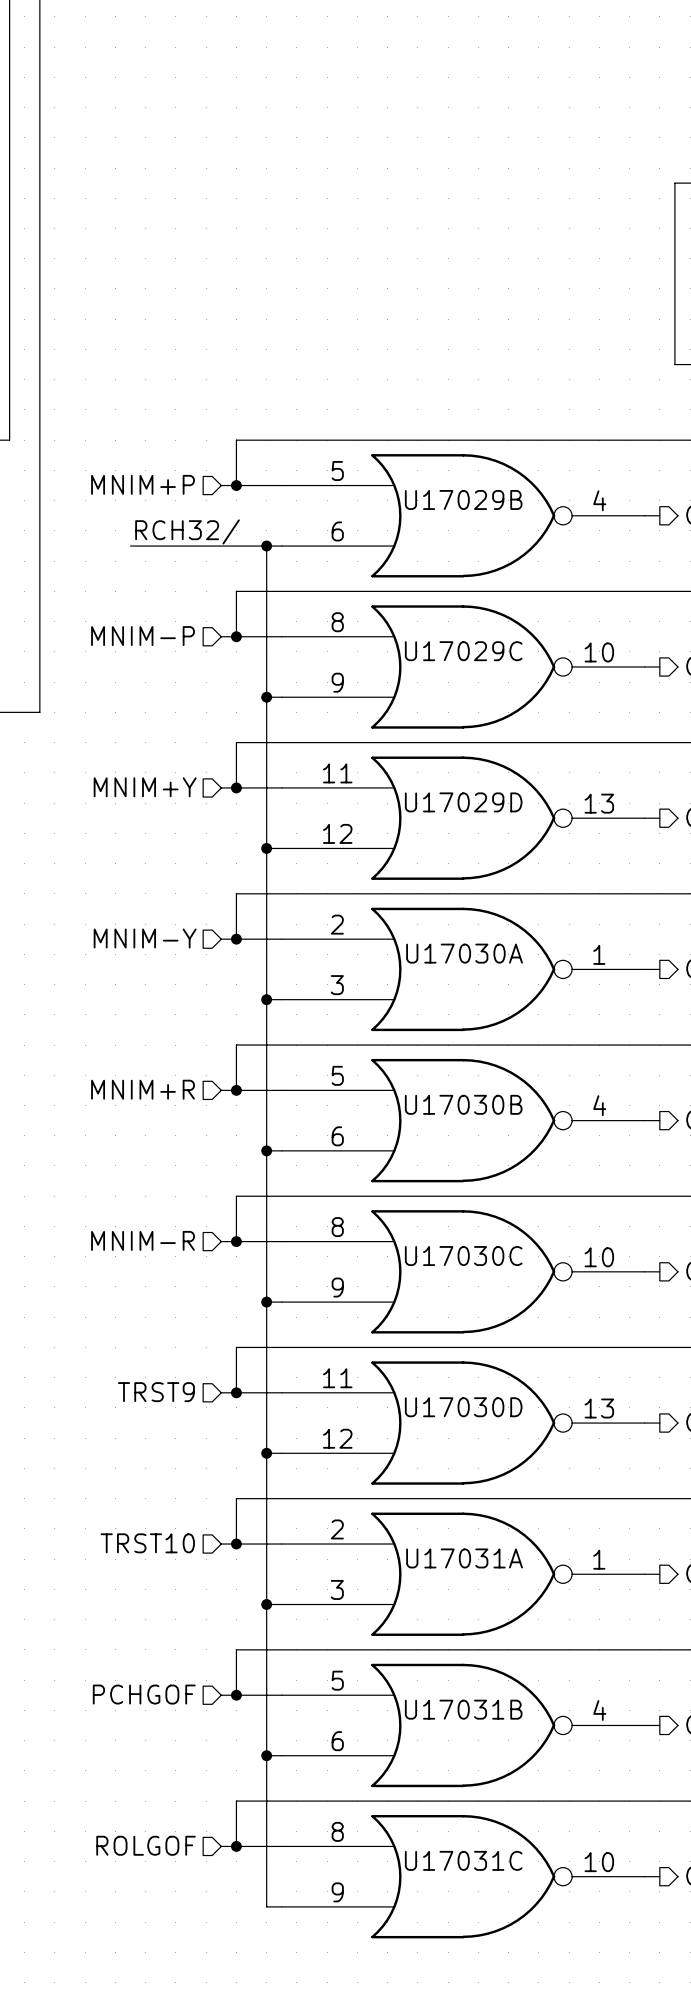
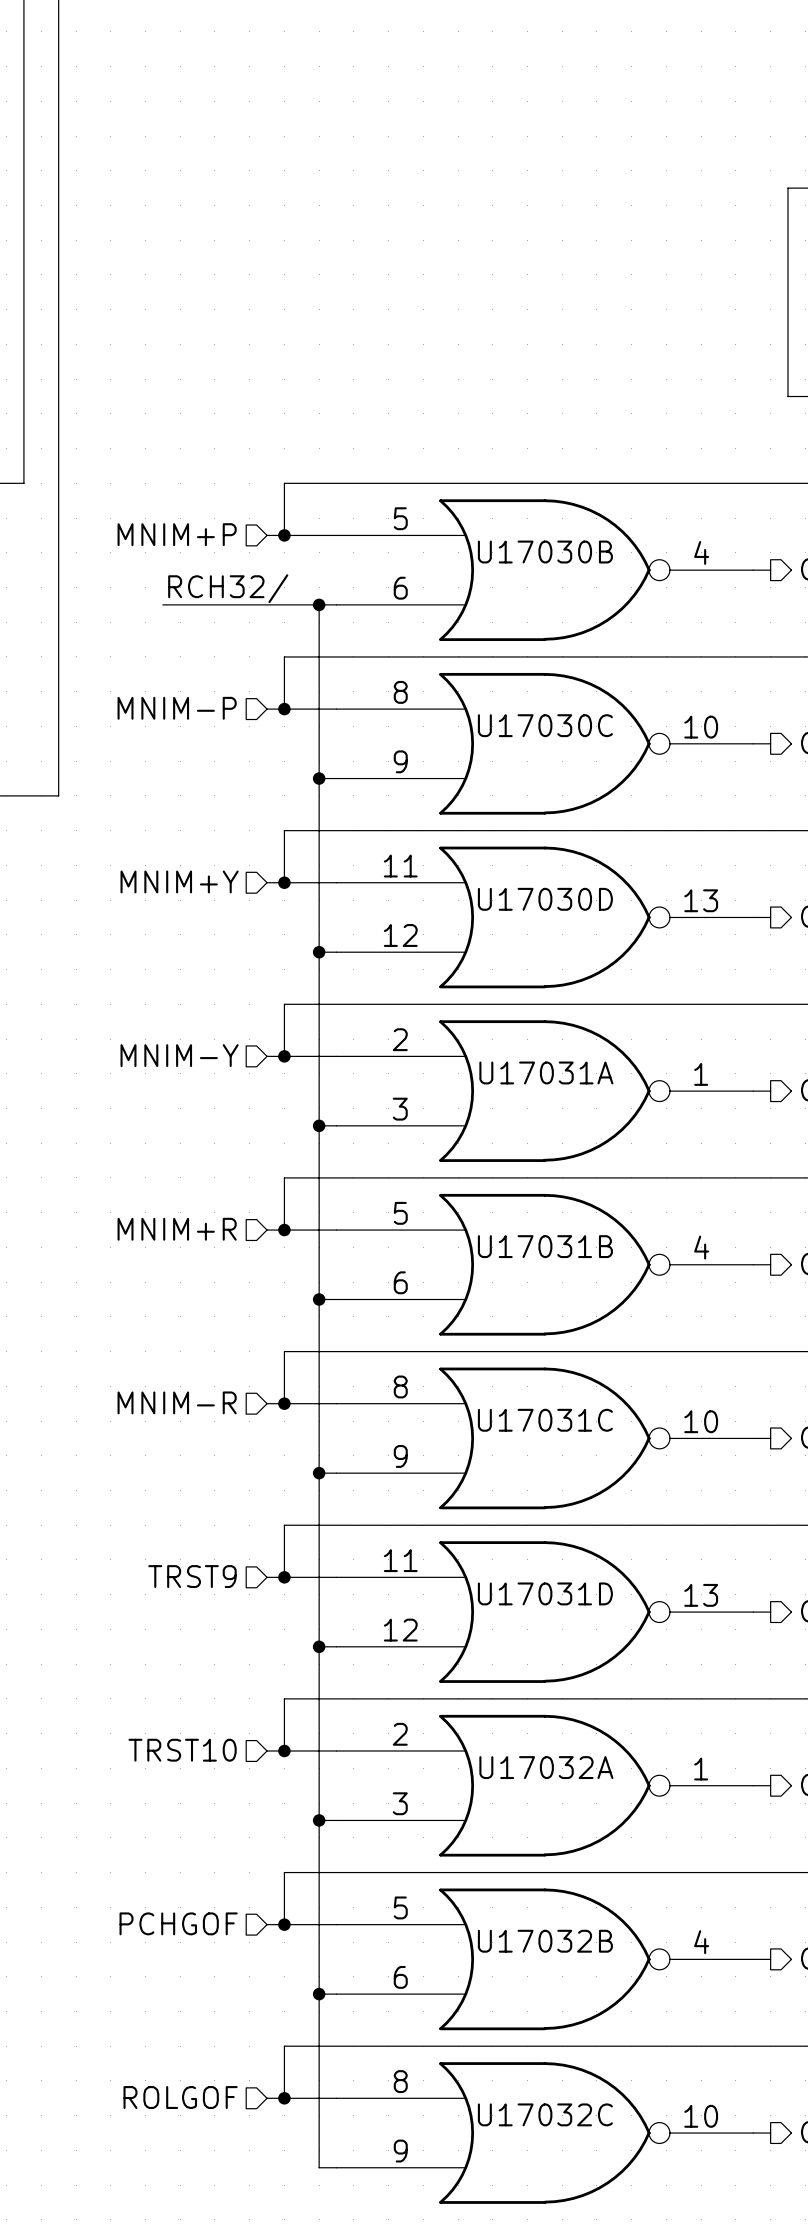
U17029B name: U17029B (463, 499) -> U17030B (545, 552)
U17029C name: U17029C (463, 651) -> U17030C (545, 725)
U17029D name: U17029D (463, 802) -> U17030D (545, 899)
U17030A name: U17030A (464, 953) -> U17031A (546, 1072)
U17030B name: U17030B (463, 1104) -> U17031B (545, 1246)
U17030C name: U17030C (463, 1256) -> U17031C (545, 1420)
U17030D name: U17030D (463, 1407) -> U17031D (545, 1593)
U17031A name: U17031A (464, 1558) -> U17032A (546, 1767)
U17031B name: U17031B (463, 1709) -> U17032B (545, 1941)
U17031C name: U17031C (463, 1860) -> U17032C (545, 2114)

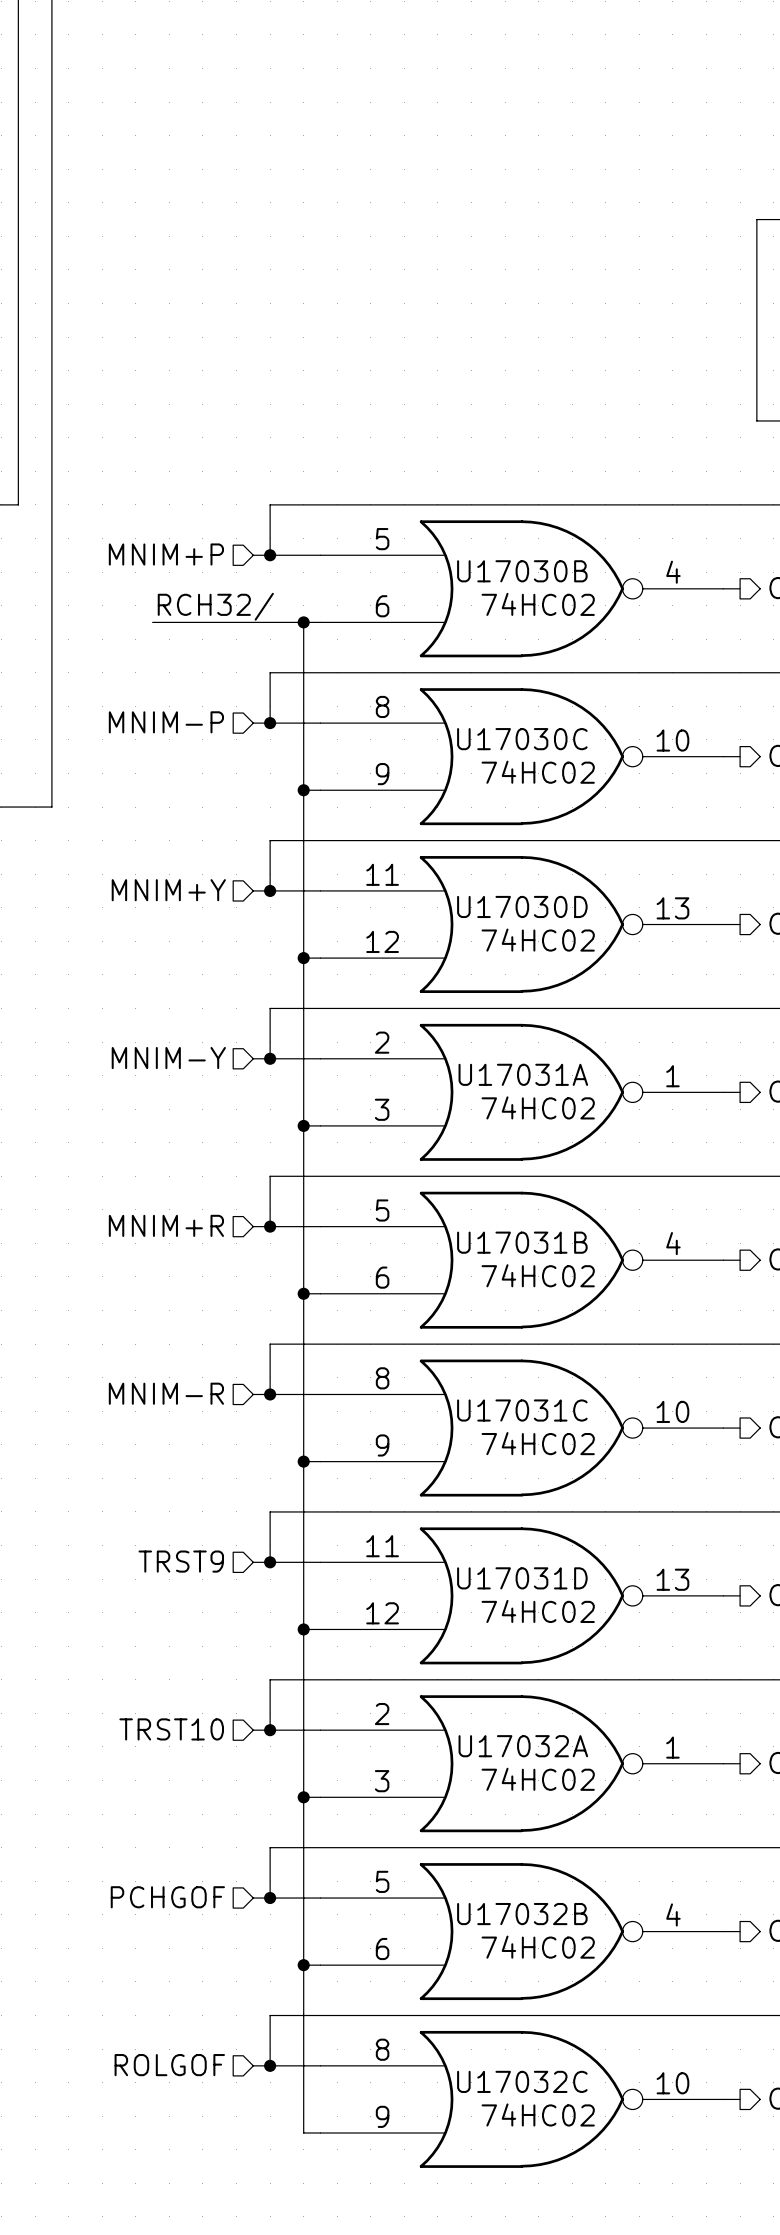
U17030B value: none -> 74HC02 (538, 604)
U17030C value: none -> 74HC02 (538, 772)
U17030D value: none -> 74HC02 (538, 940)
U17031A value: none -> 74HC02 (538, 1107)
U17031B value: none -> 74HC02 (538, 1275)
U17031C value: none -> 74HC02 (538, 1443)
U17031D value: none -> 74HC02 (538, 1611)
U17032A value: none -> 74HC02 (538, 1779)
U17032B value: none -> 74HC02 (538, 1947)
U17032C value: none -> 74HC02 (538, 2114)

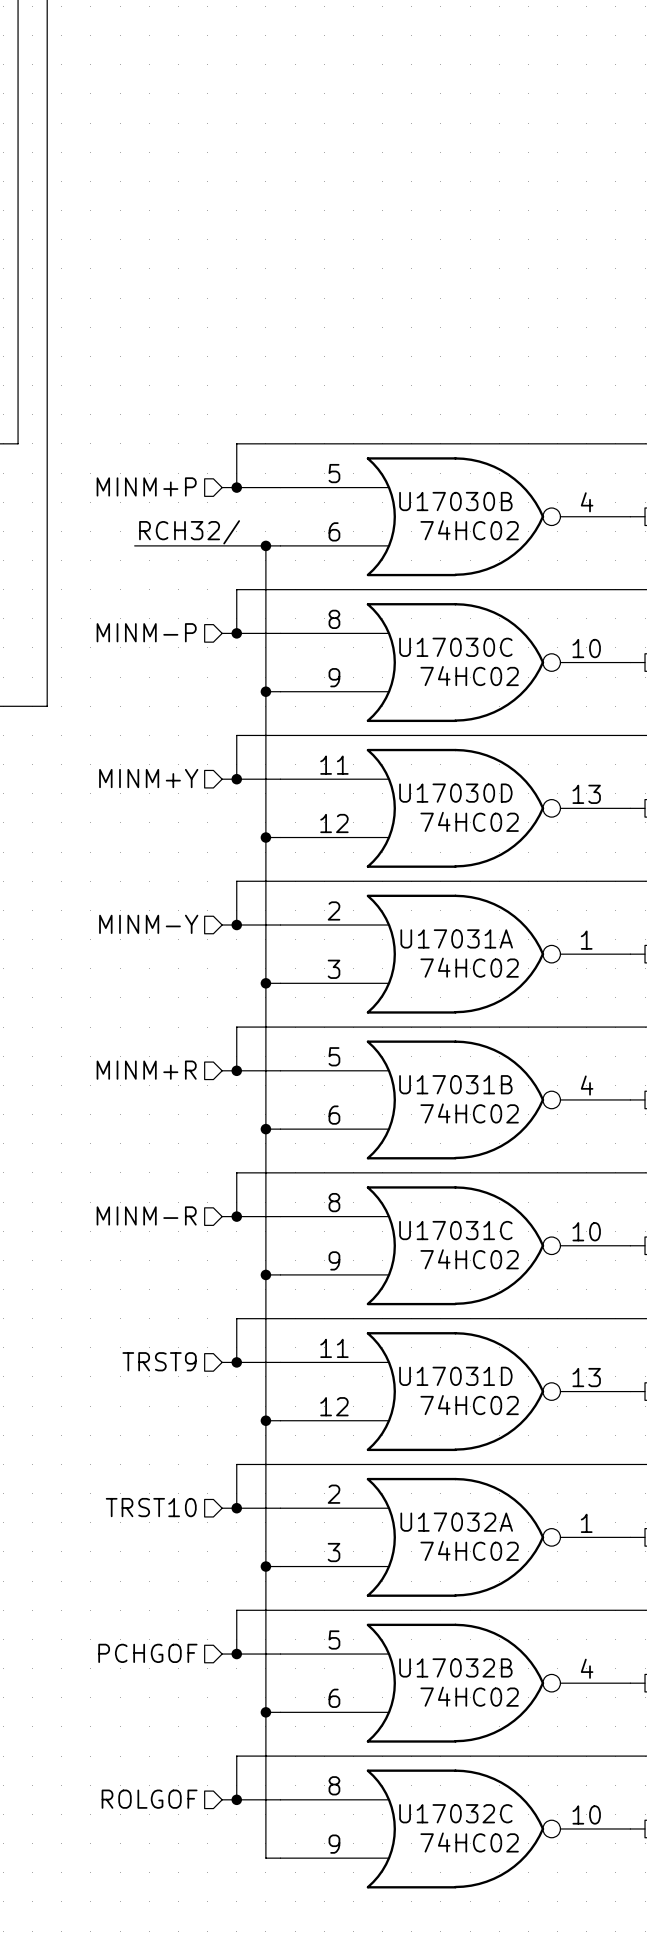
hierarchical label: MNIM+P (166, 554) -> MINM+P (146, 486)
hierarchical label: MNIM-P (166, 722) -> MINM-P (146, 632)
hierarchical label: MNIM+Y (168, 890) -> MINM+Y (148, 778)
hierarchical label: MNIM-Y (168, 1058) -> MINM-Y (148, 924)
hierarchical label: MNIM+R (166, 1225) -> MINM+R (146, 1070)
hierarchical label: MNIM-R (166, 1393) -> MINM-R (146, 1215)

